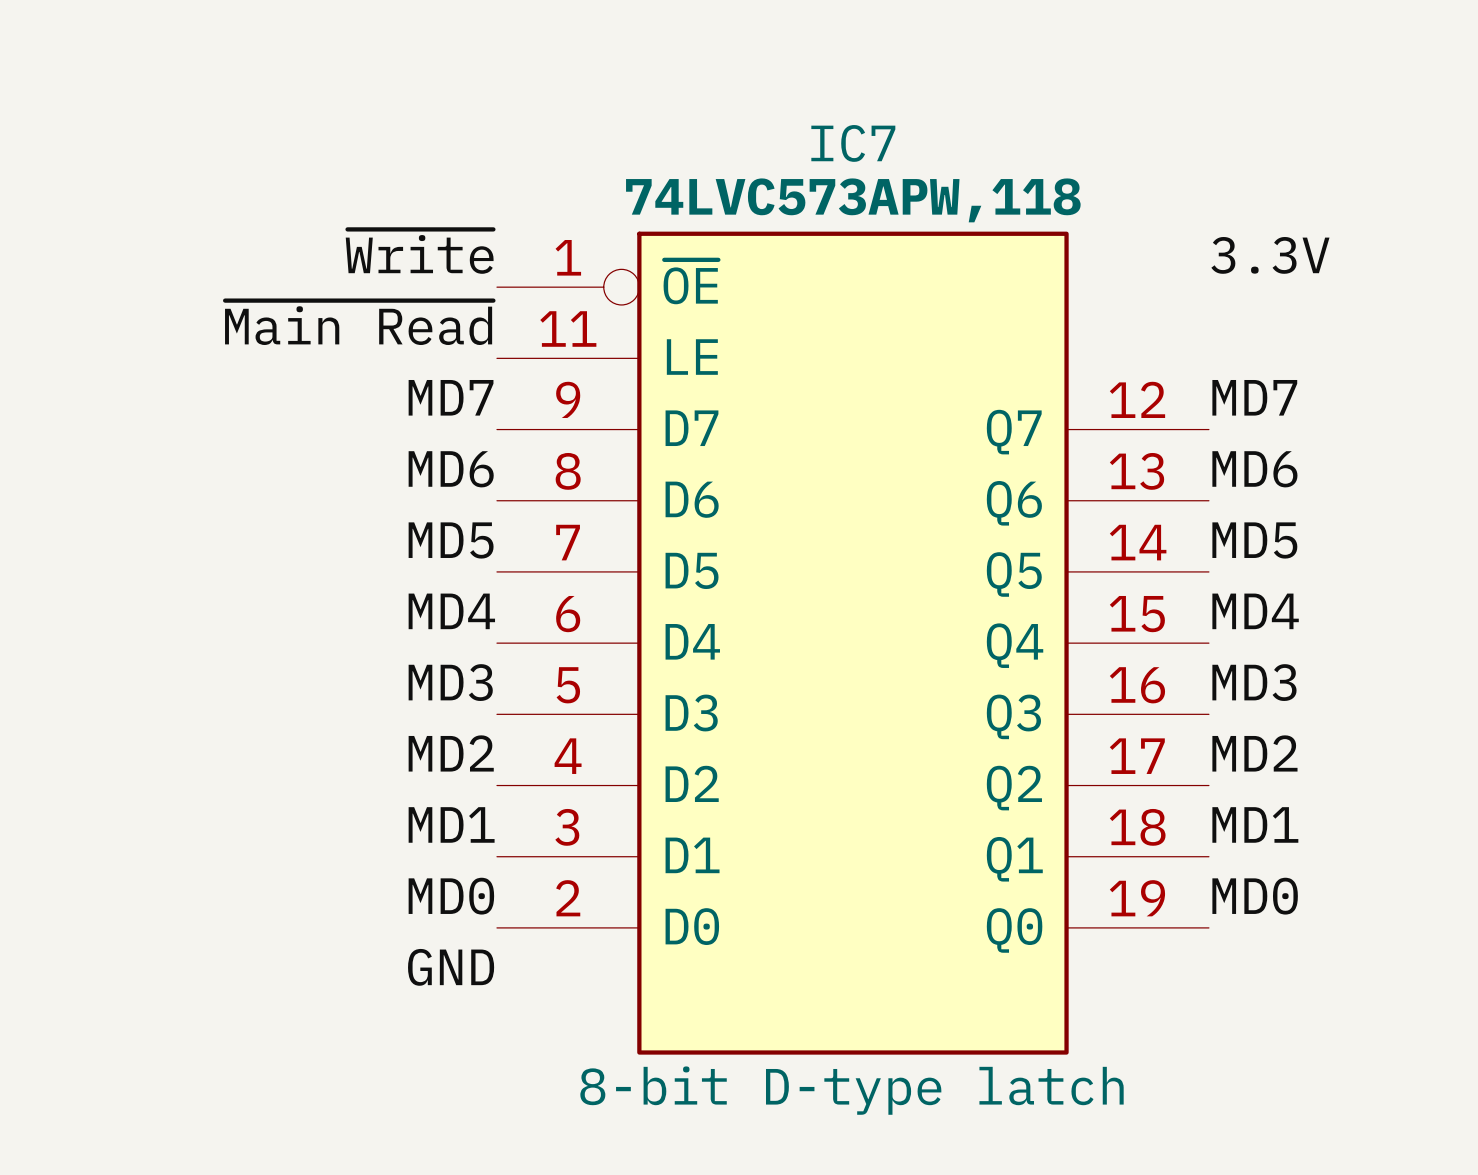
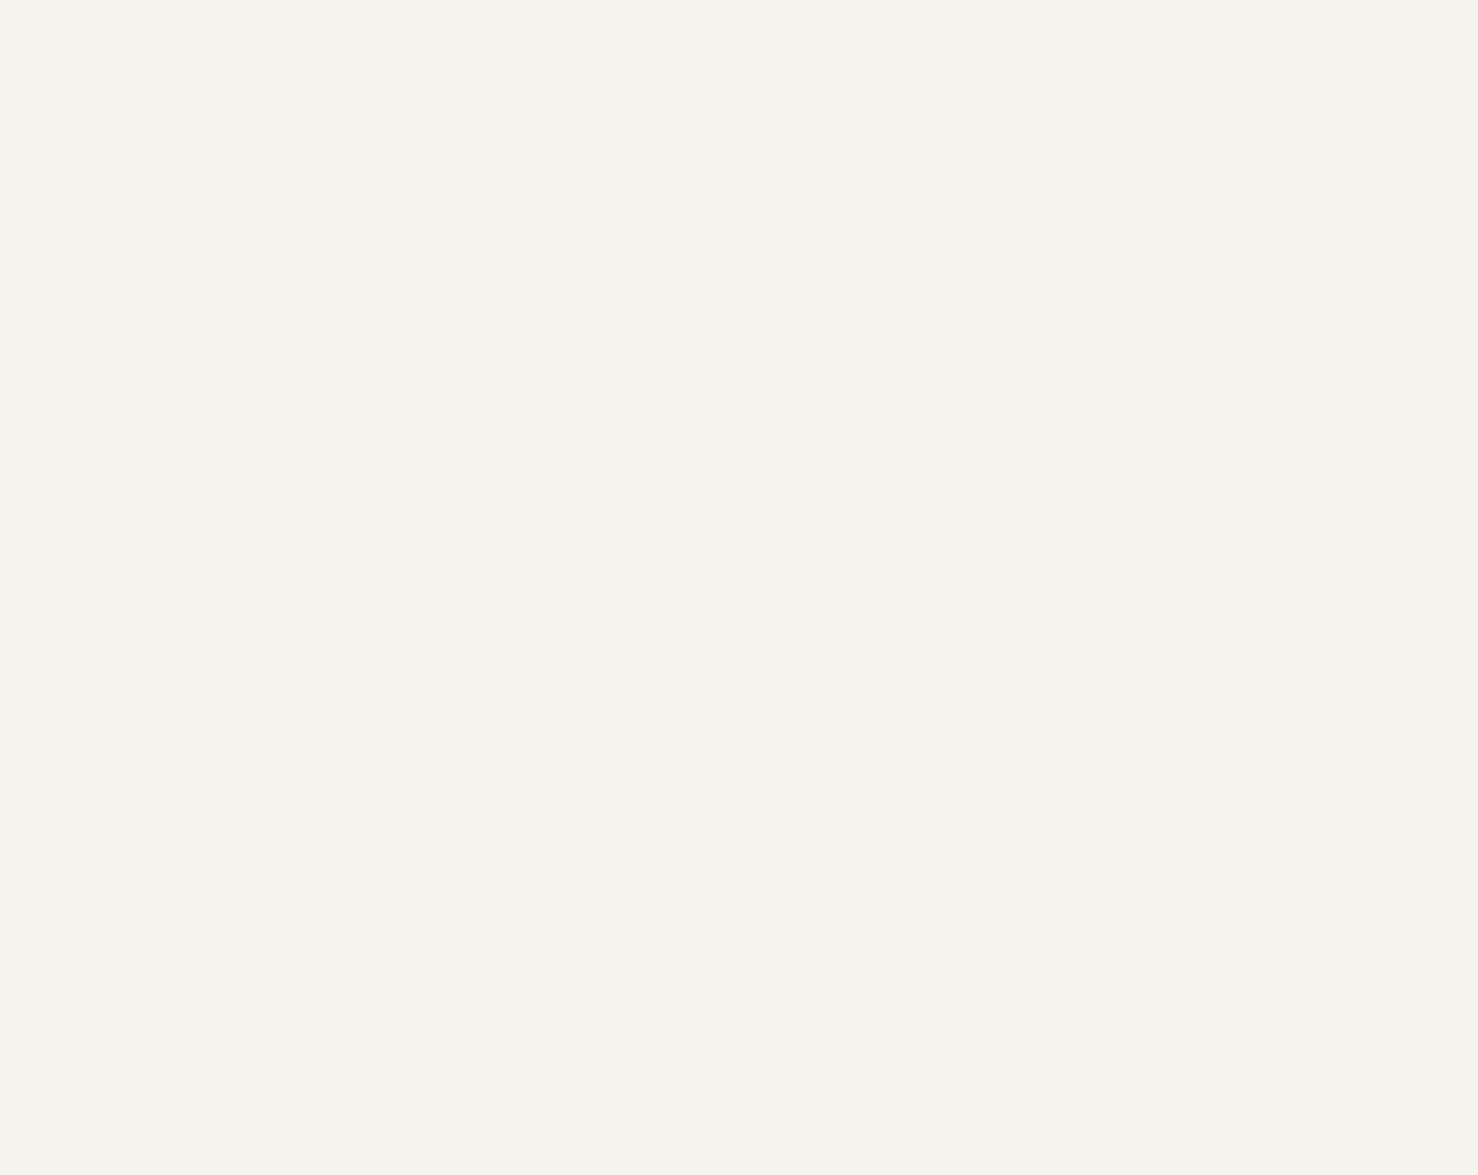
label: ~{Write} (419, 251) -> none
label: 3.3V (1270, 255) -> none
label: ~{Main Read} (359, 322) -> none
label: MD7 (451, 397) -> none
label: MD7 (1254, 397) -> none
label: MD6 (451, 469) -> none
label: MD6 (1254, 469) -> none
label: MD5 (451, 540) -> none
label: MD5 (1254, 540) -> none
label: MD4 (451, 611) -> none
label: MD4 (1255, 611) -> none
IC7: 74LVC573APW,118 (852, 643) -> none
label: MD3 (450, 682) -> none
label: MD3 (1254, 682) -> none
label: MD2 (451, 753) -> none
label: MD2 (1254, 753) -> none
label: MD1 (451, 824) -> none
label: MD1 (1255, 824) -> none
label: MD0 (451, 896) -> none
label: MD0 (1255, 896) -> none
label: GND (451, 967) -> none

